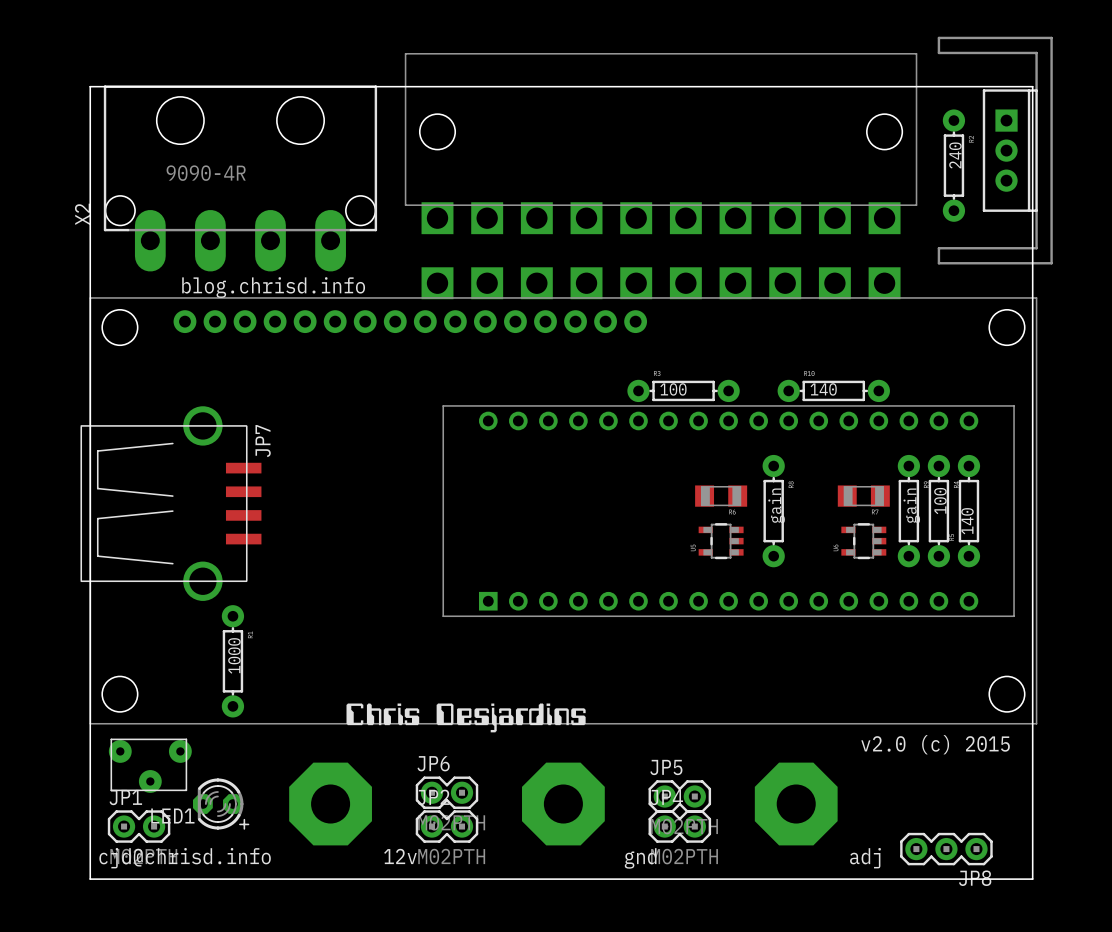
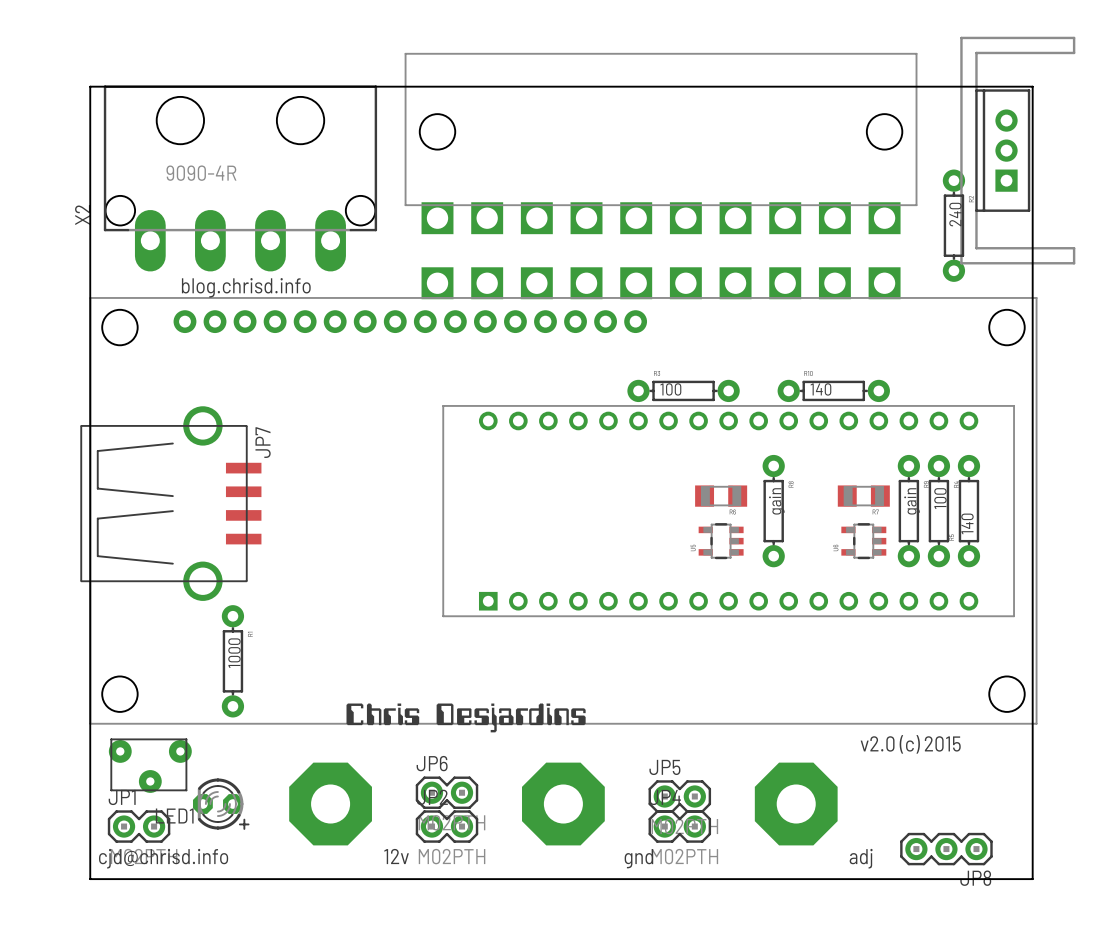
part rotation: 0° (995, 150) -> 180° (1017, 150)
part position: (953, 165) -> (953, 225)

